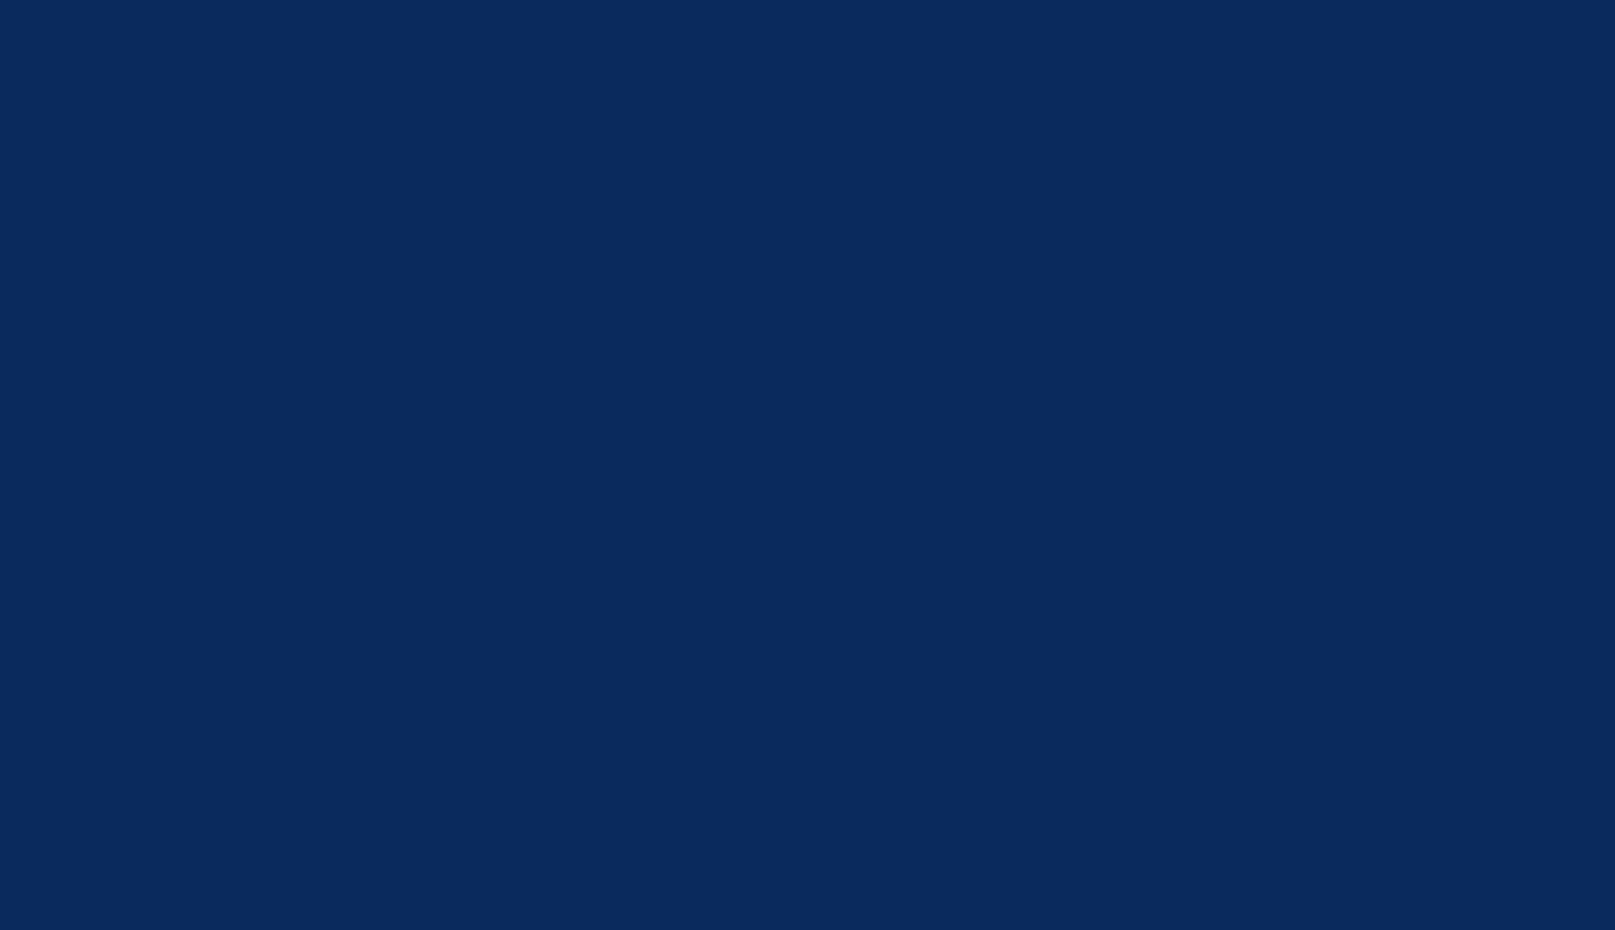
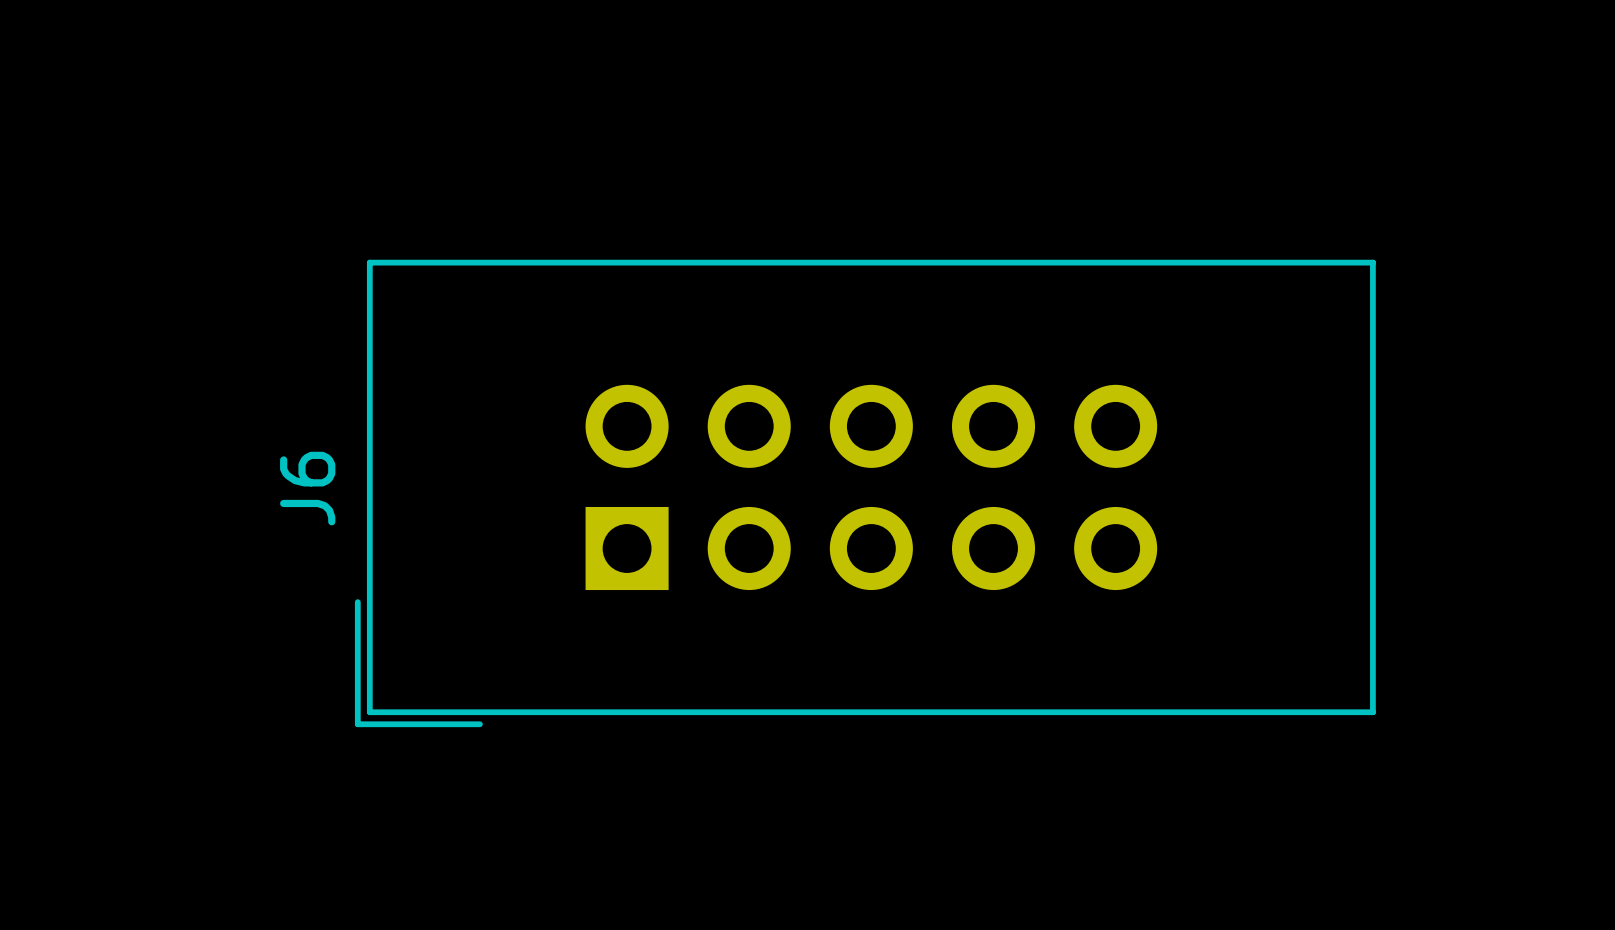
J6: none -> (865, 493)

